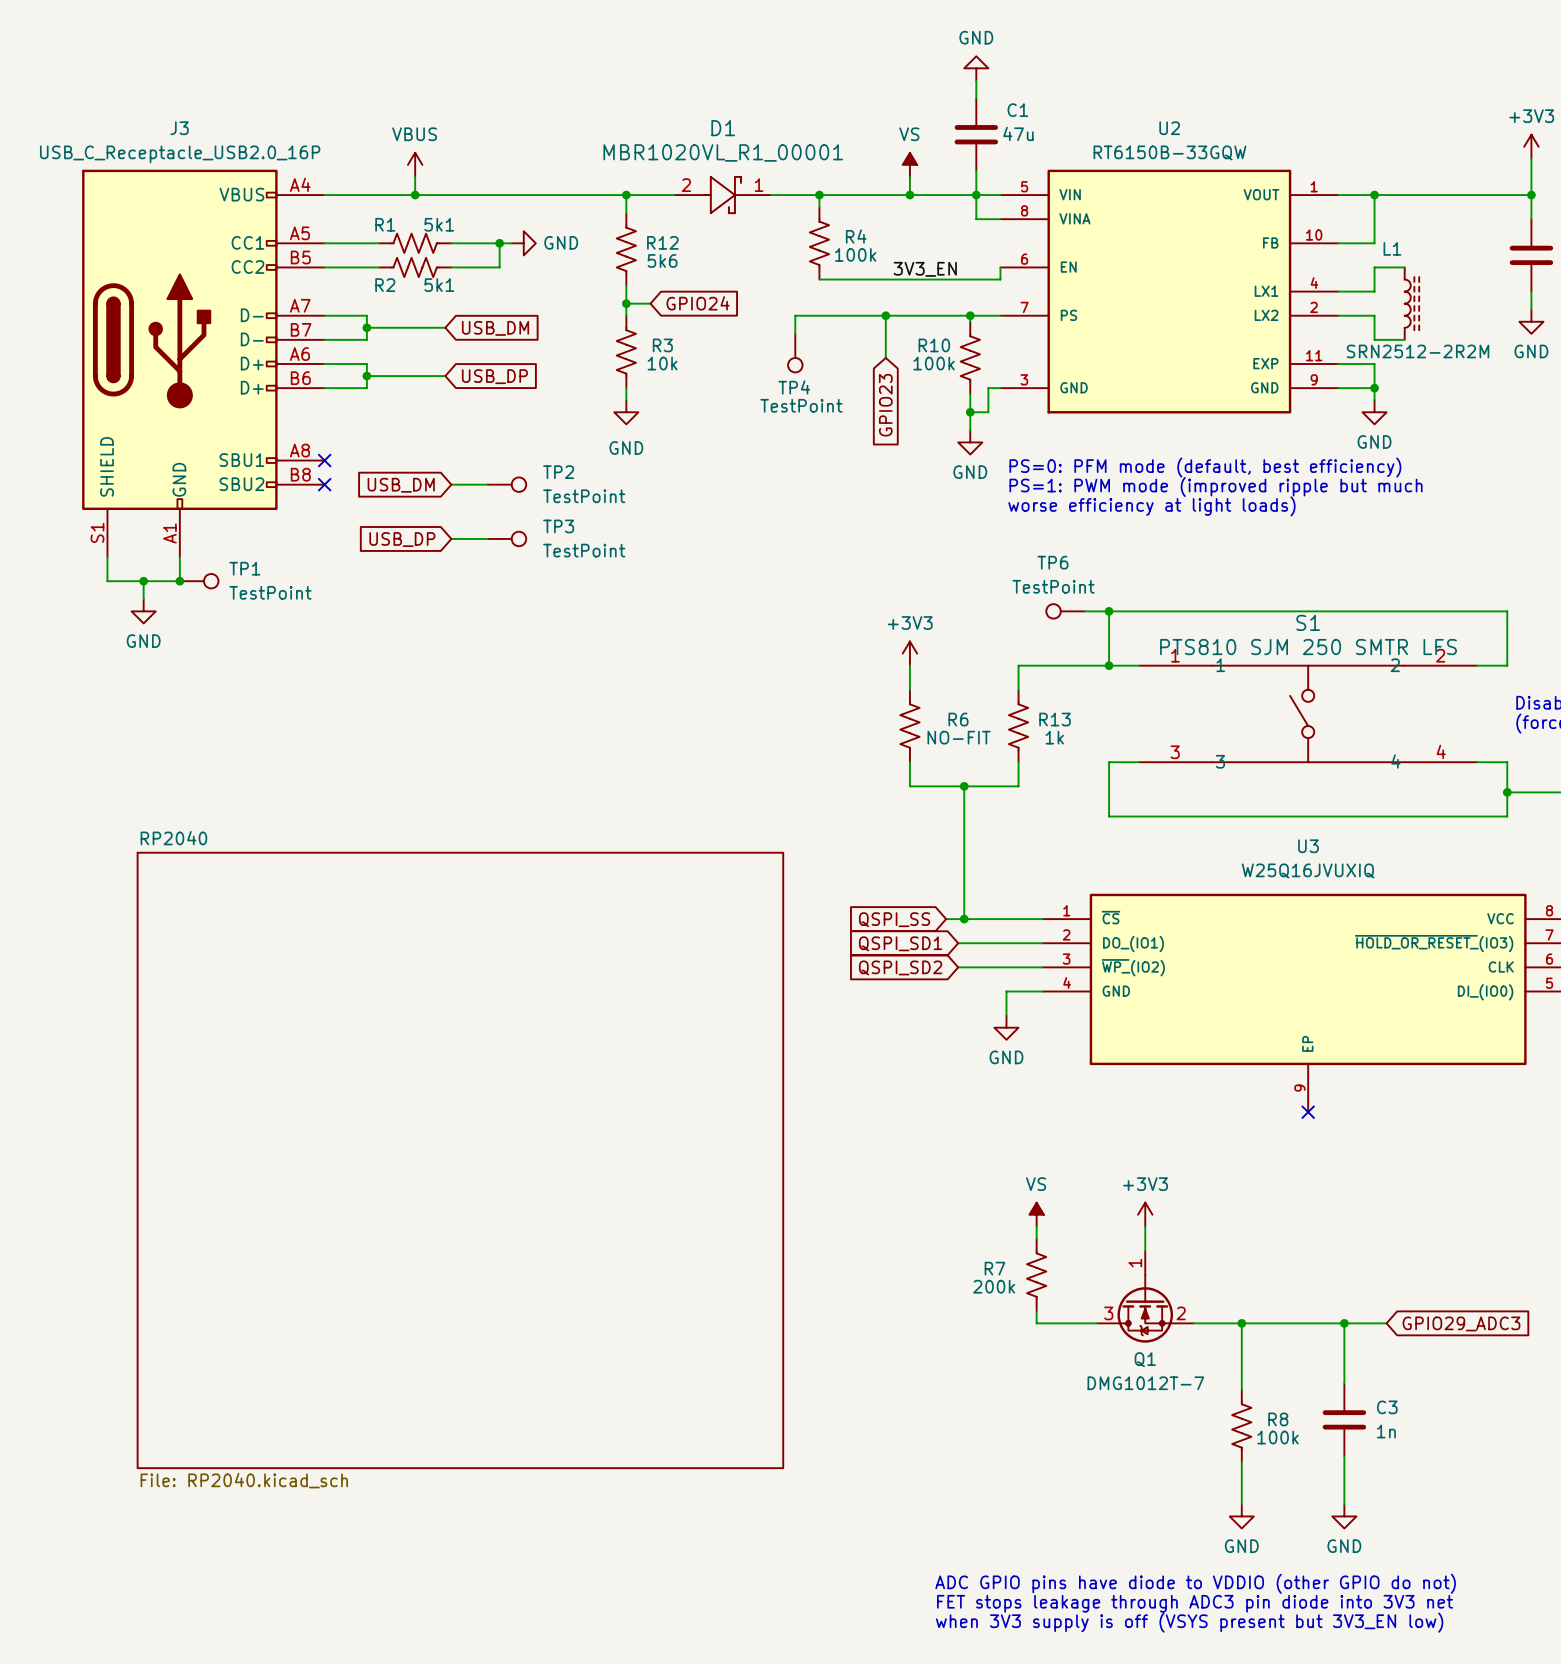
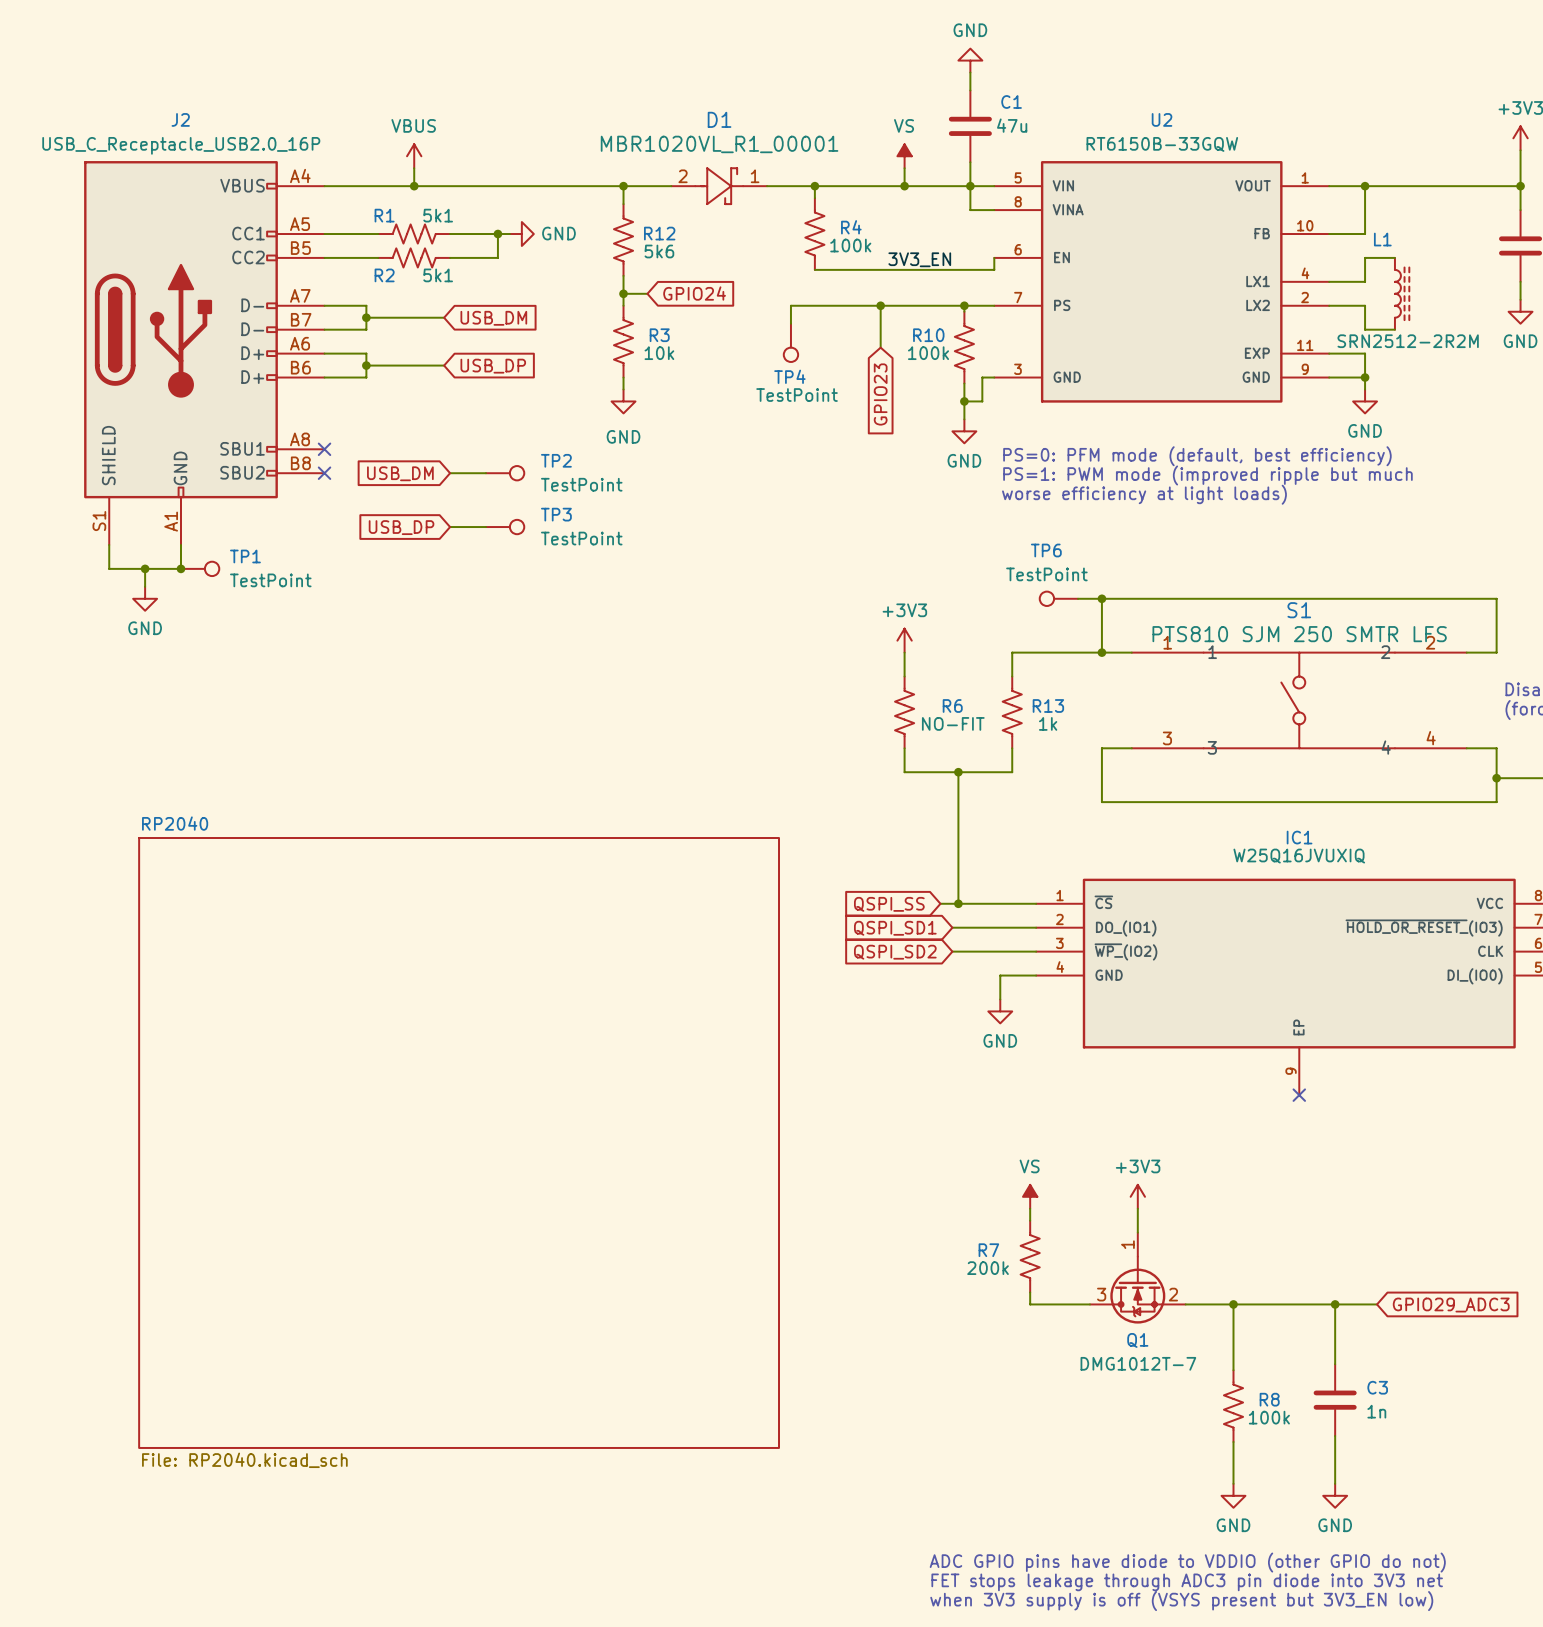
J3 name: J3 (179, 128) -> J2 (180, 119)
U3 name: U3 (1308, 846) -> IC1 (1299, 837)

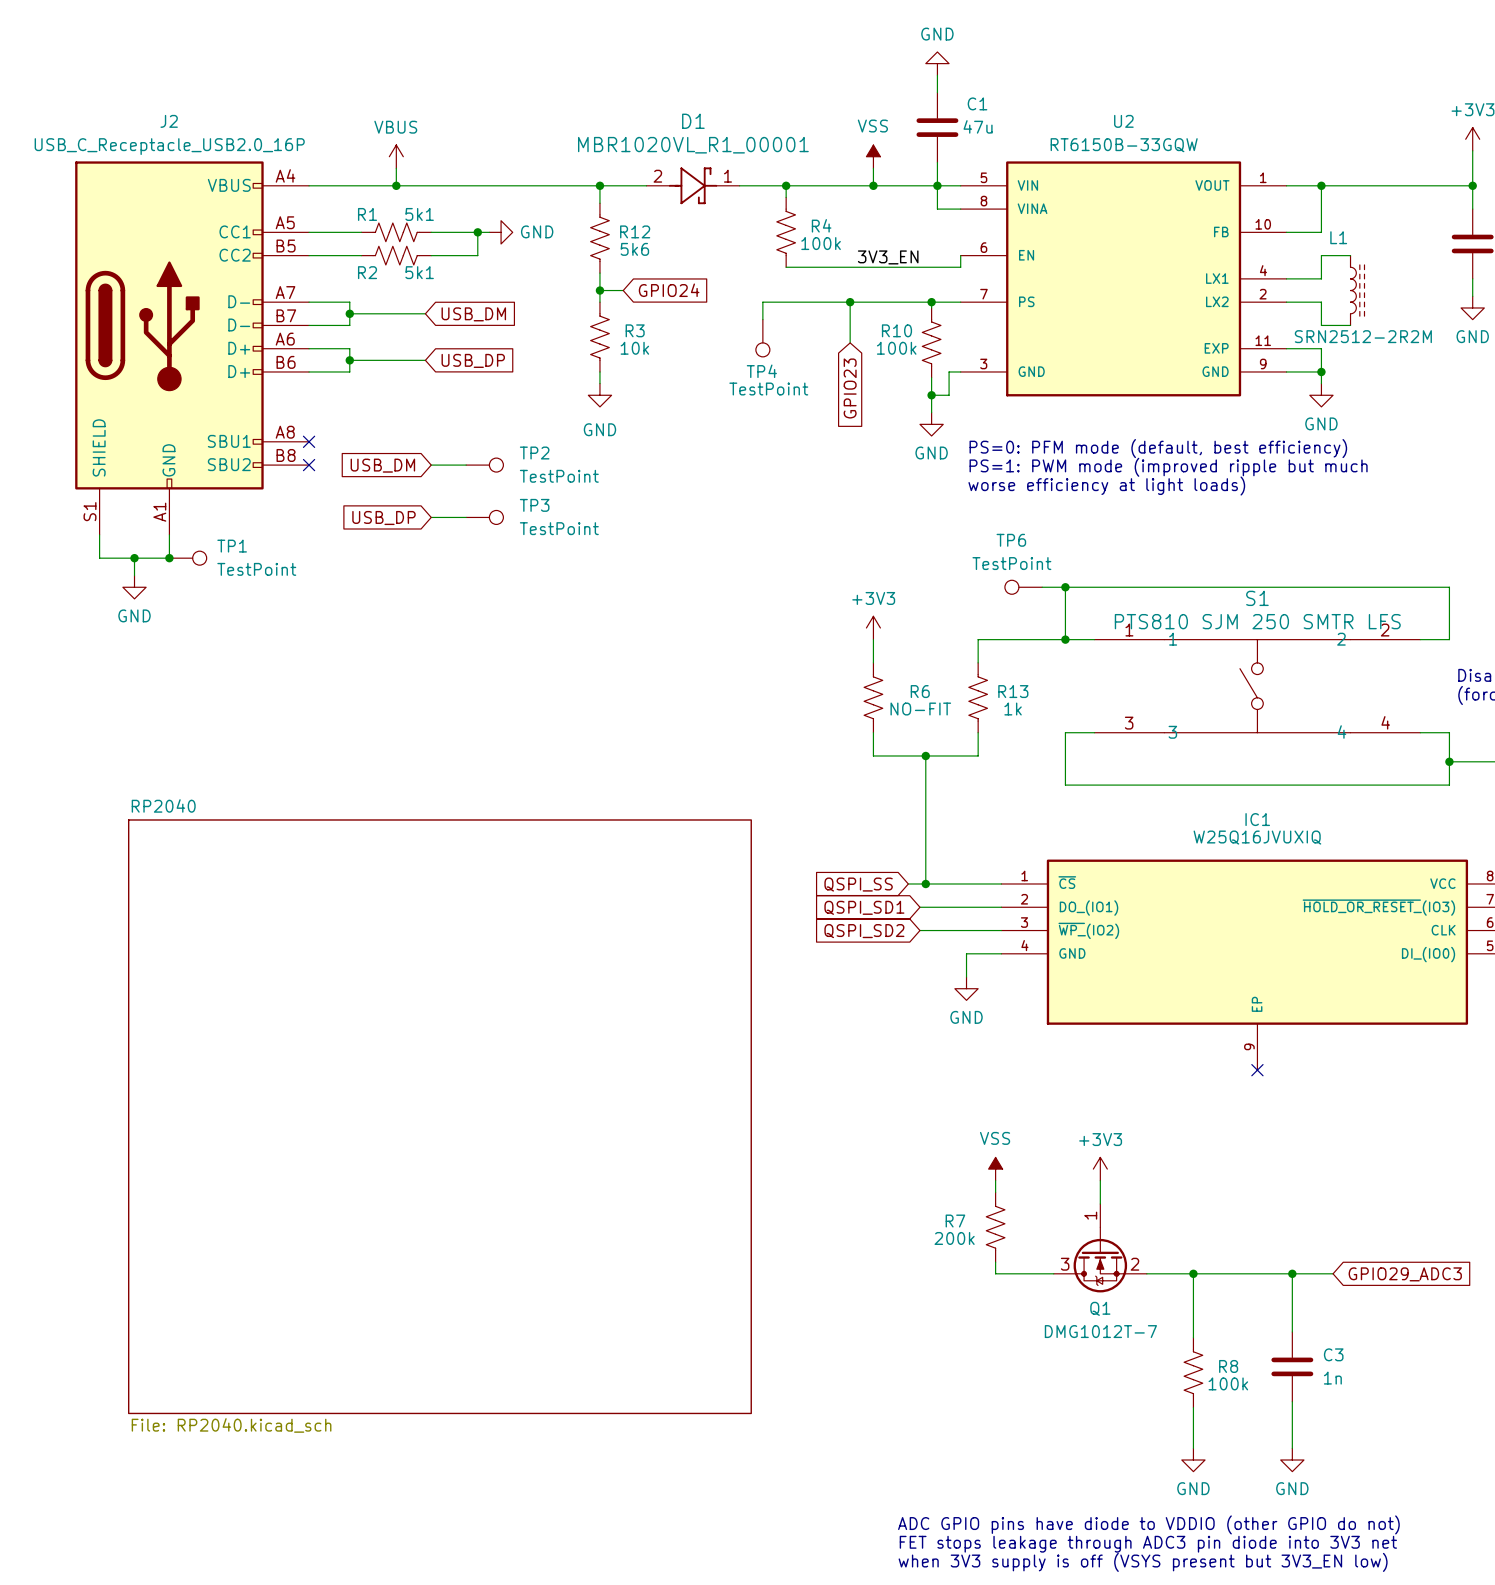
power symbol: VS (904, 156) -> VSS (873, 156)
power symbol: VS (1030, 1196) -> VSS (995, 1169)

